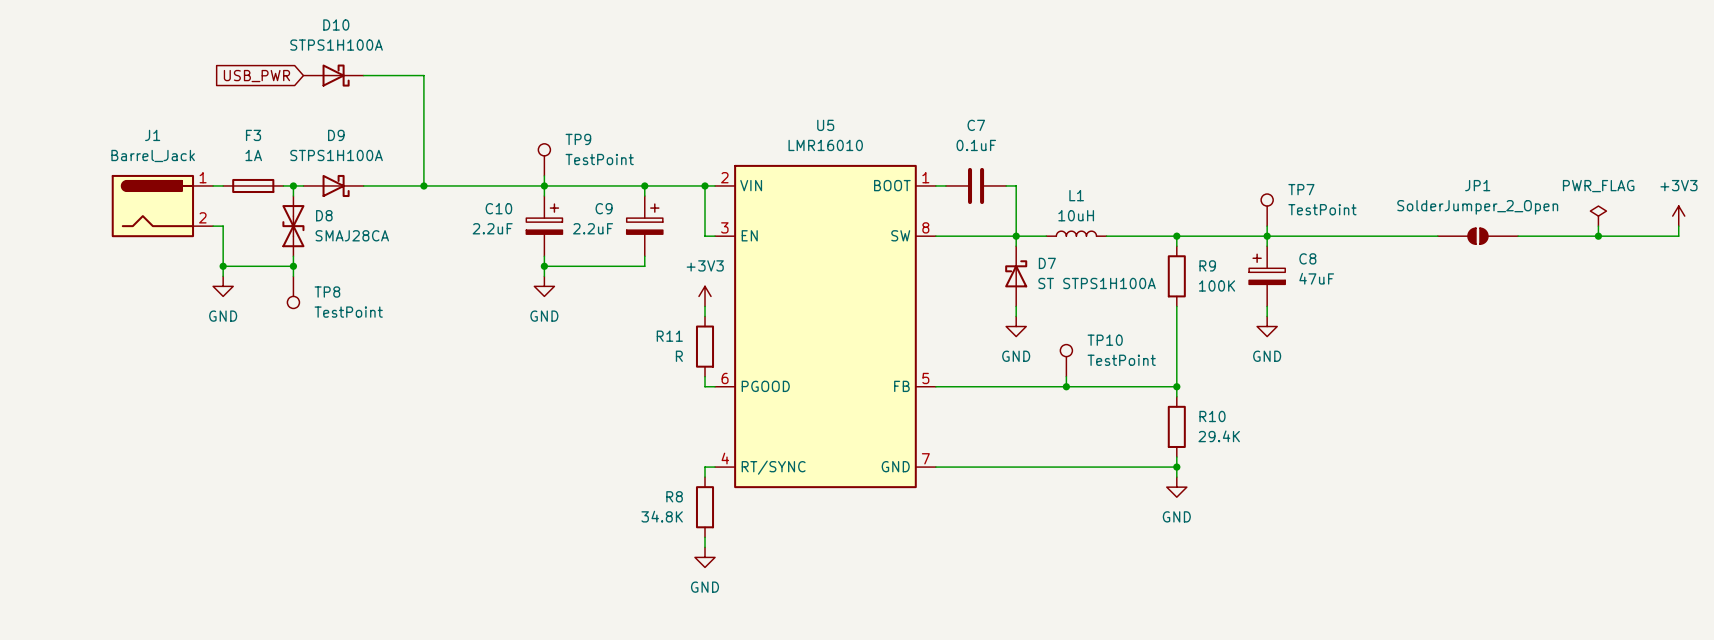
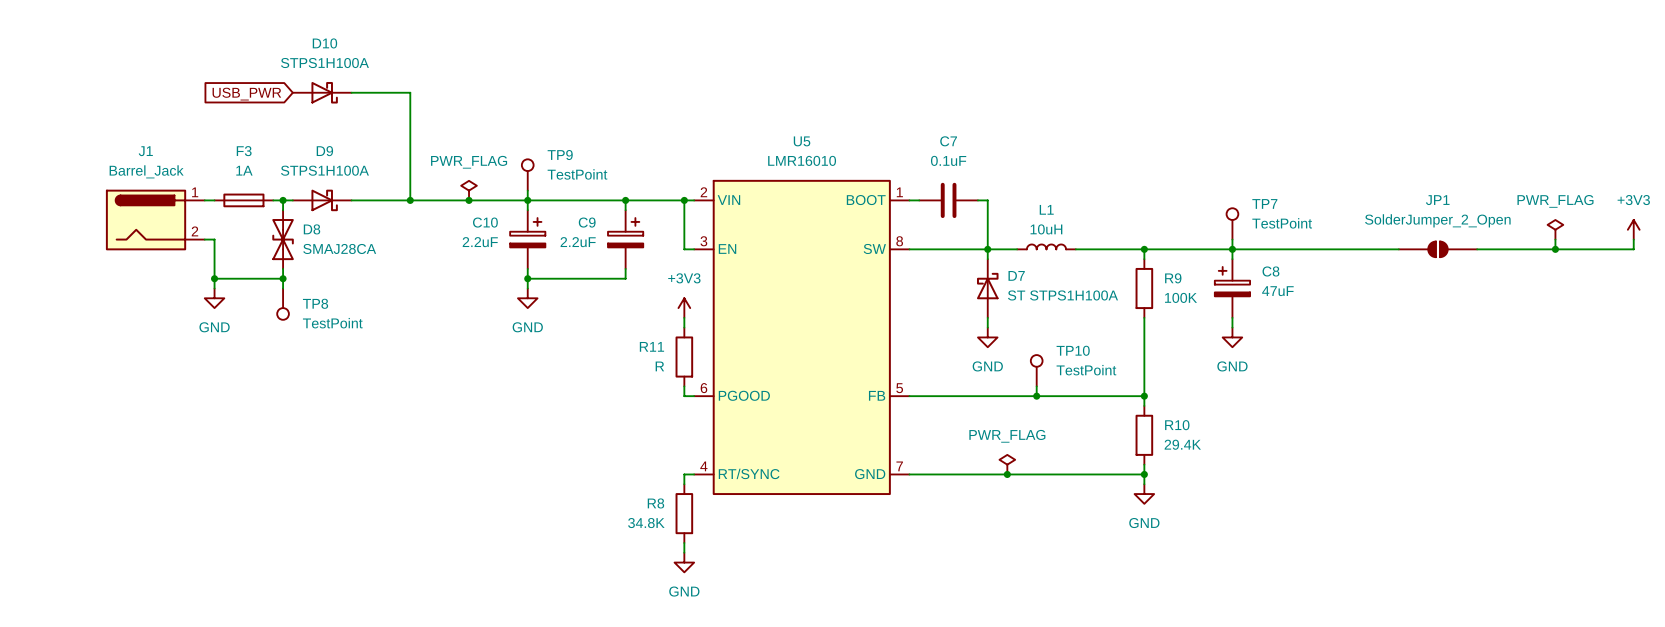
power symbol: none -> PWR_FLAG (469, 190)
junction: none -> (469, 200)
power symbol: none -> PWR_FLAG (1007, 464)
junction: none -> (1007, 474)

